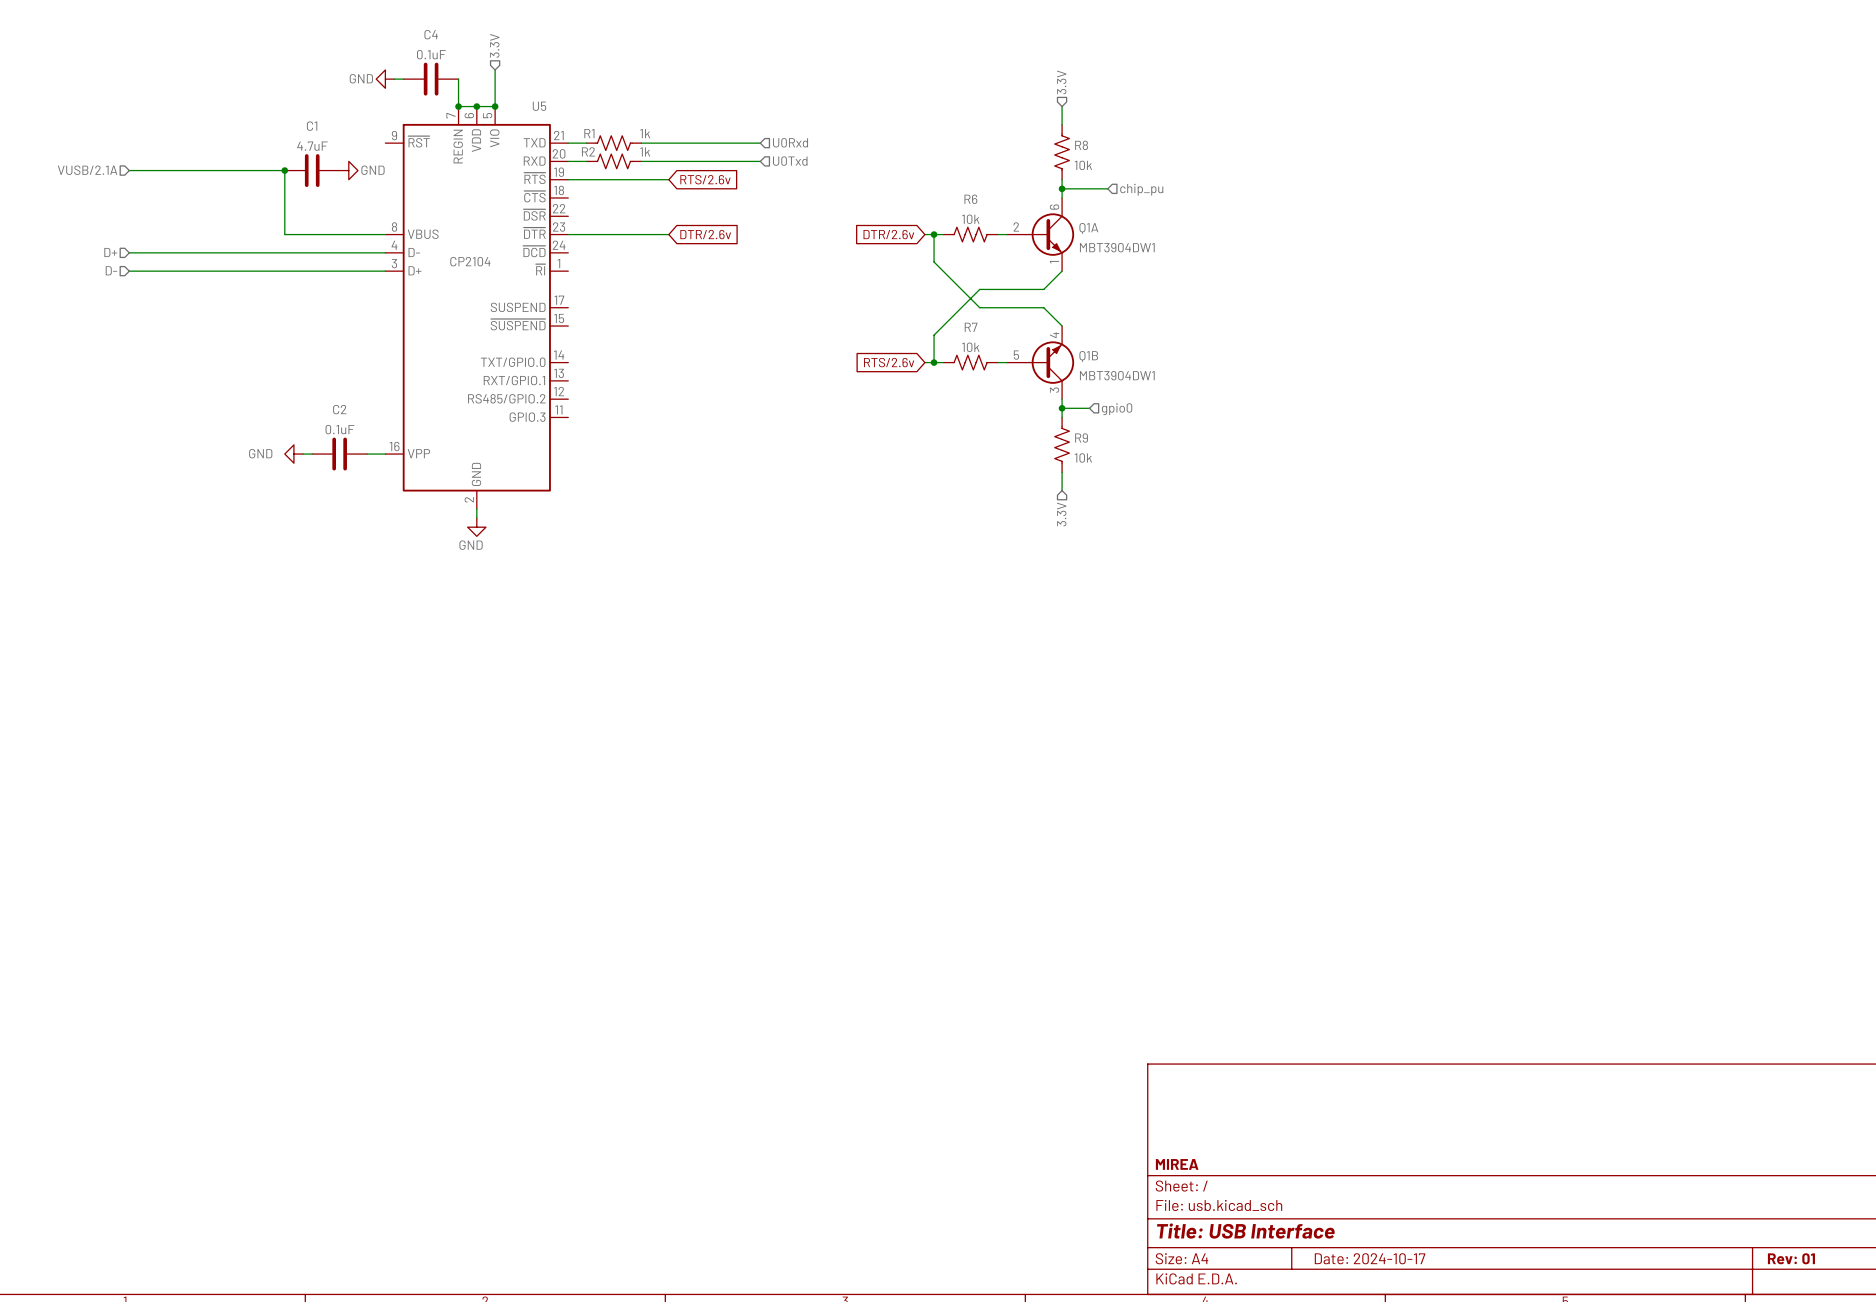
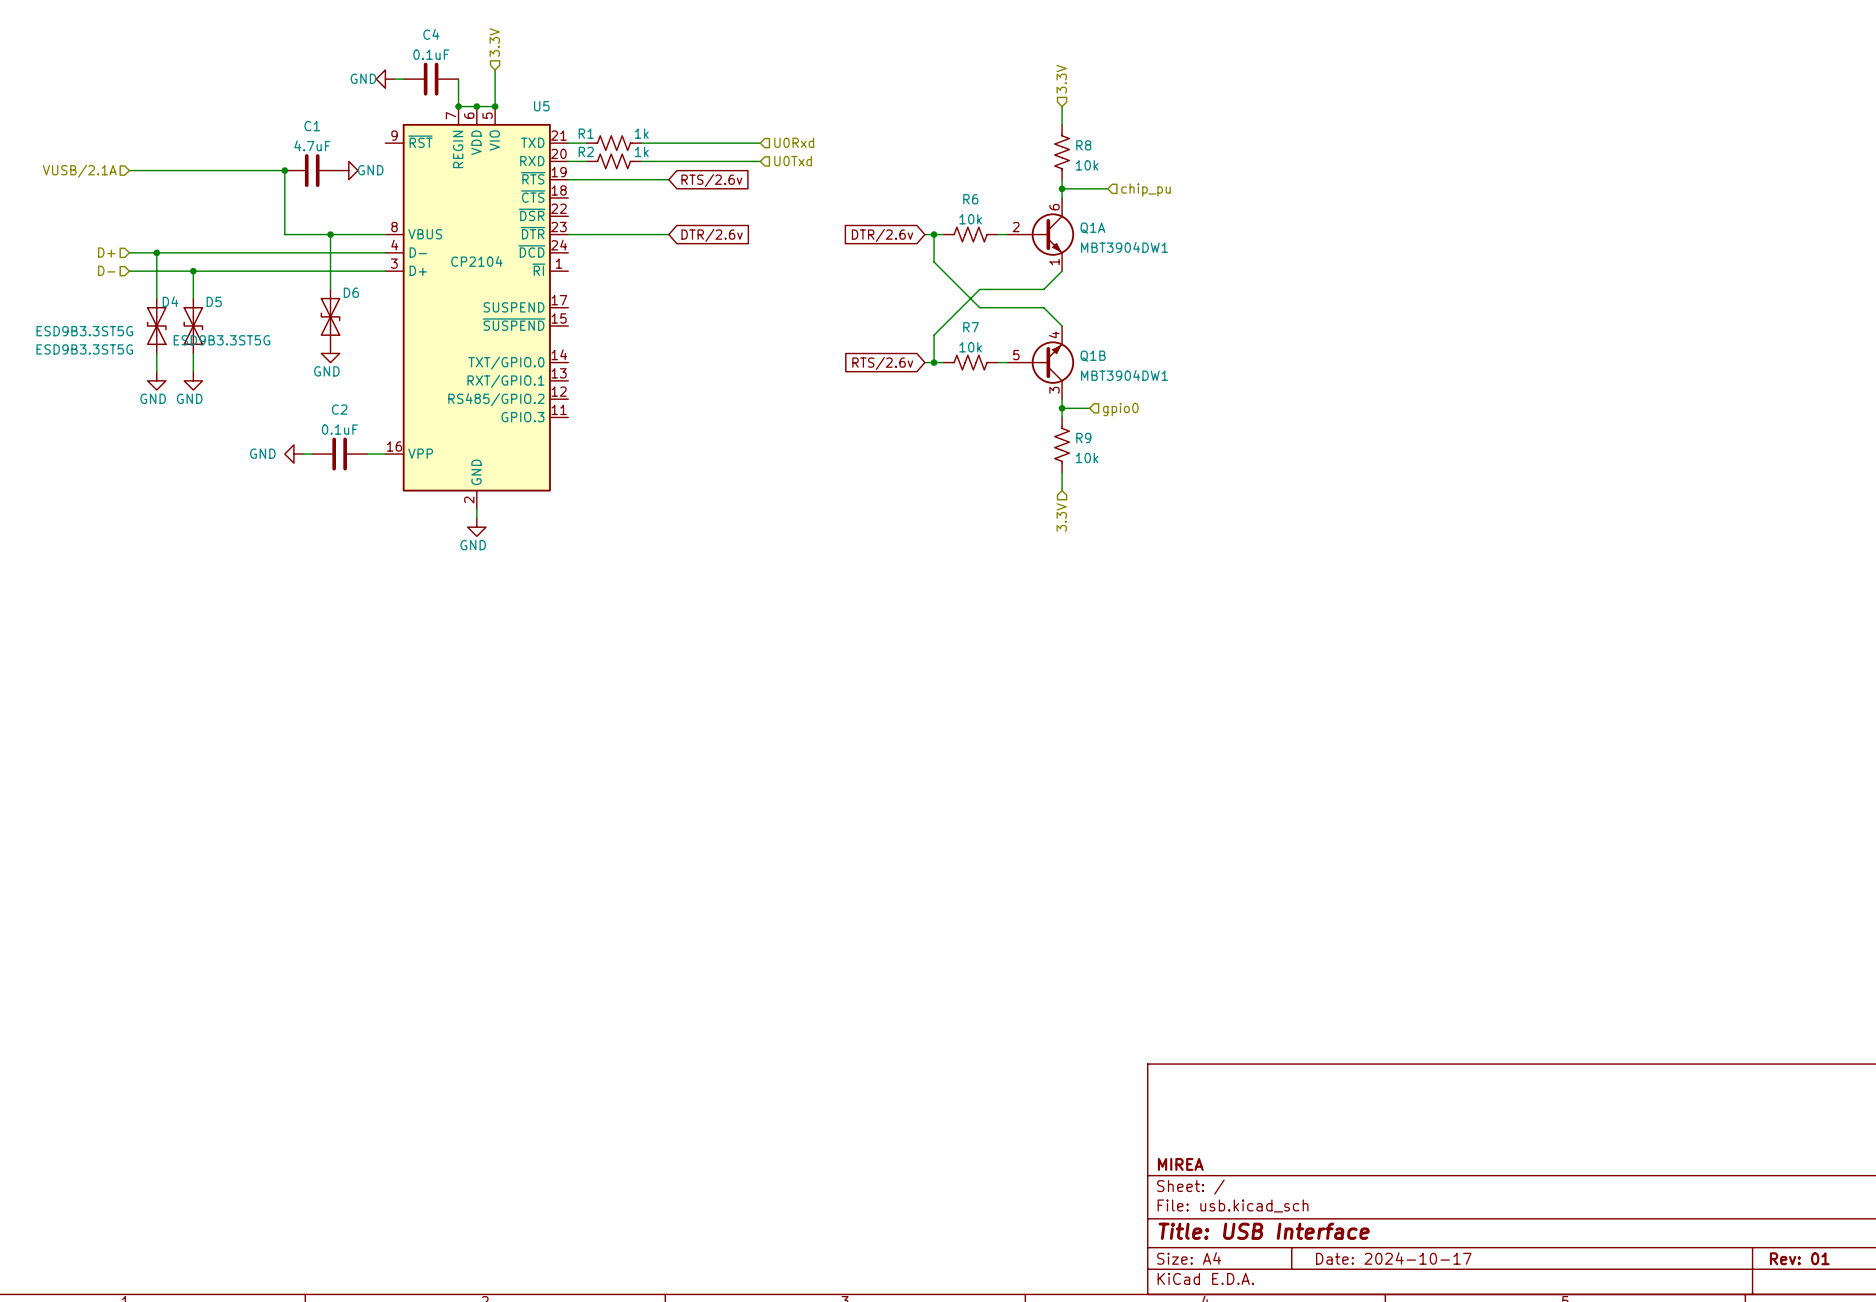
wire: none -> (330, 234) (330, 289)
junction: none -> (330, 234)
wire: none -> (156, 252) (156, 298)
junction: none -> (156, 252)
wire: none -> (193, 271) (193, 298)
junction: none -> (193, 271)
D6: none -> ESD9B3.3ST5G (330, 316)
D4: none -> ESD9B3.3ST5G (156, 326)
D5: none -> ESD9B3.3ST5G (193, 326)
wire: none -> (156, 353) (156, 371)
wire: none -> (193, 353) (193, 371)
power symbol: none -> GND (330, 353)
power symbol: none -> GND (156, 380)
power symbol: none -> GND (193, 380)

